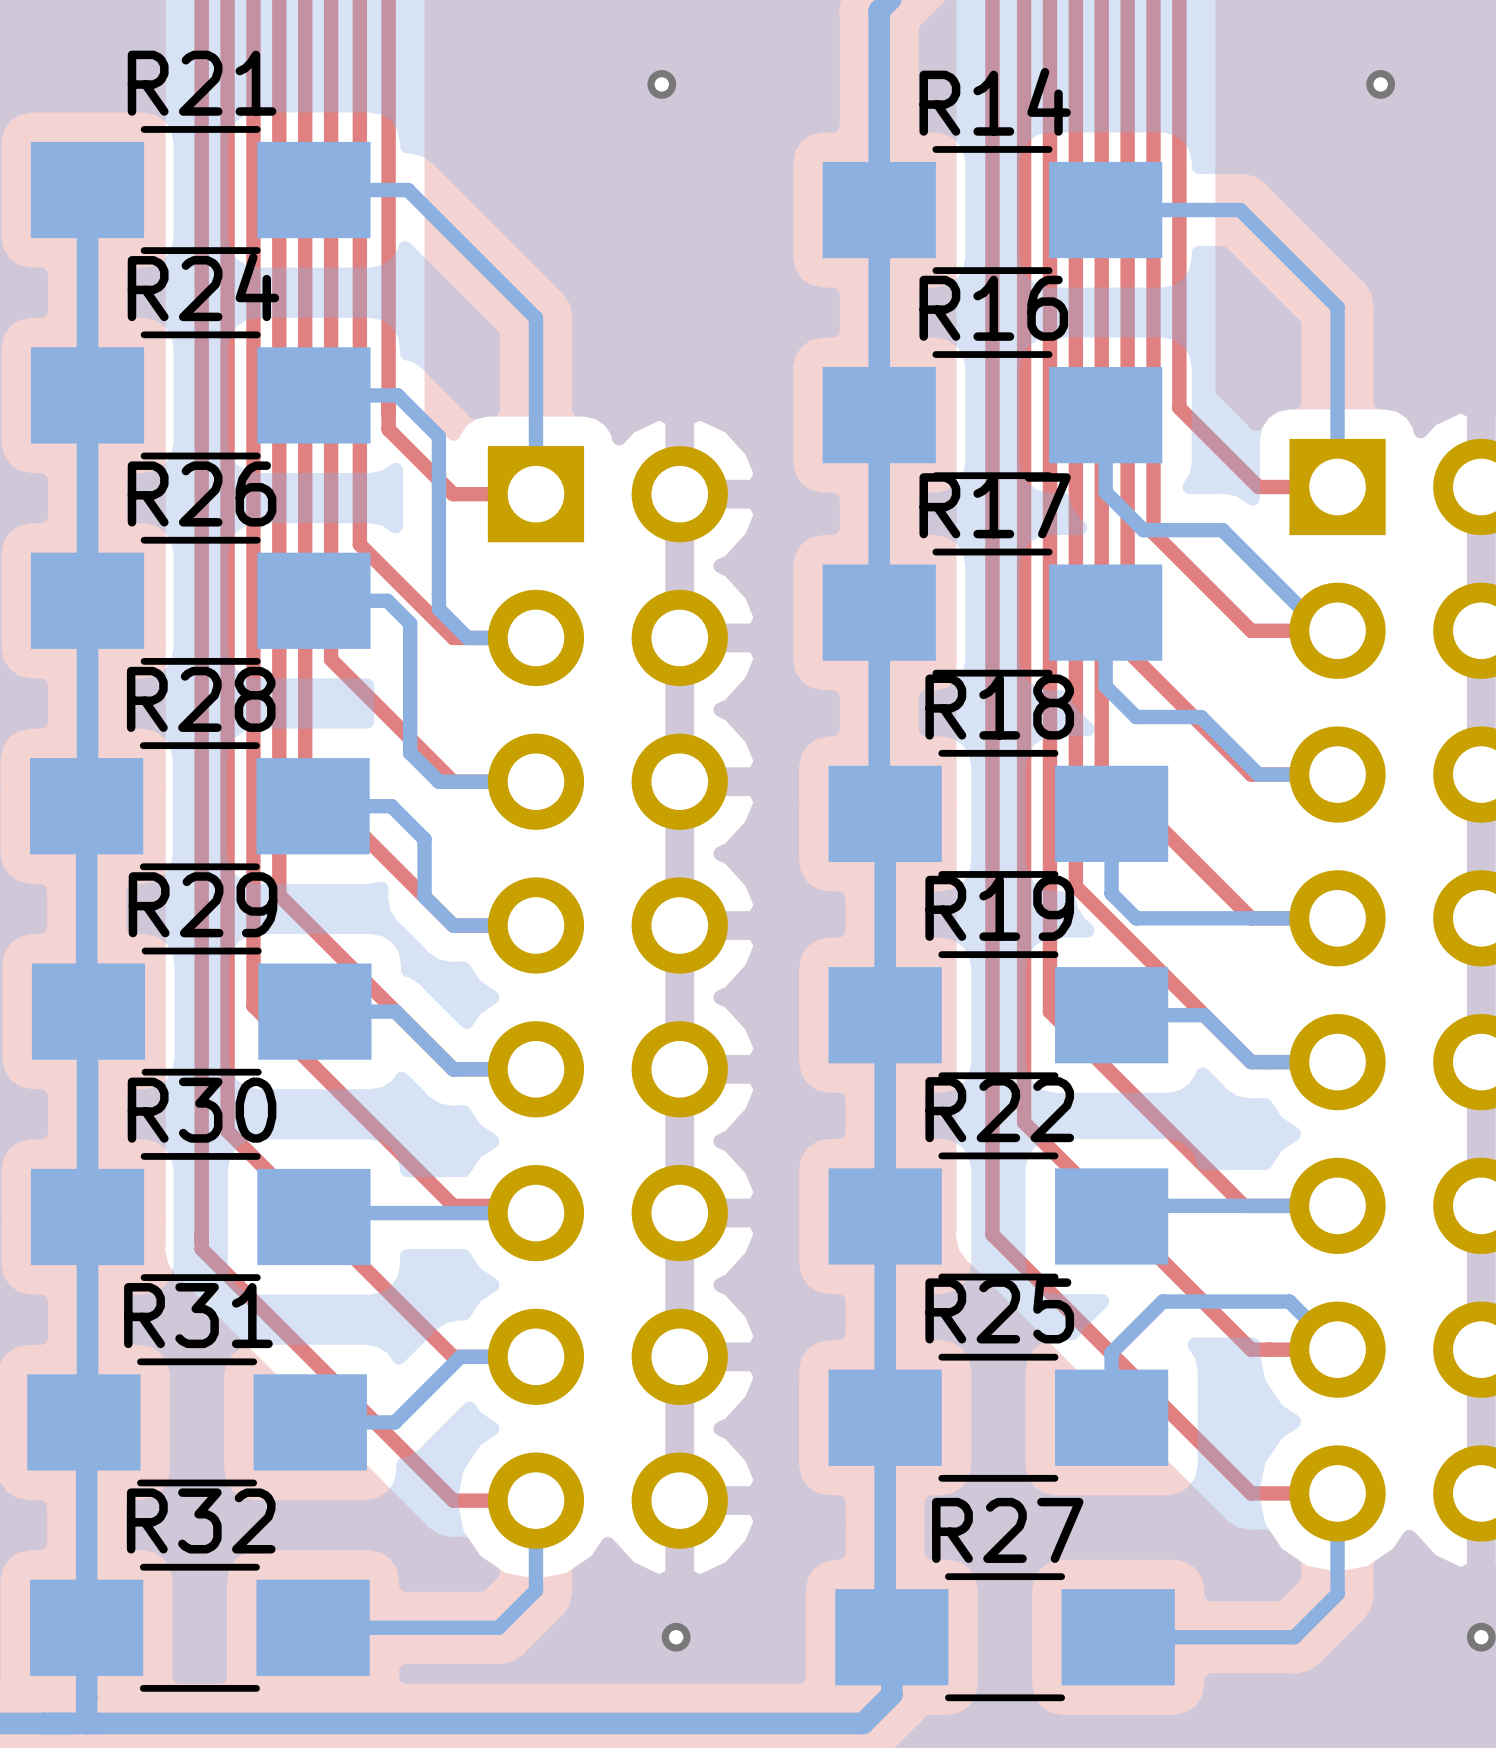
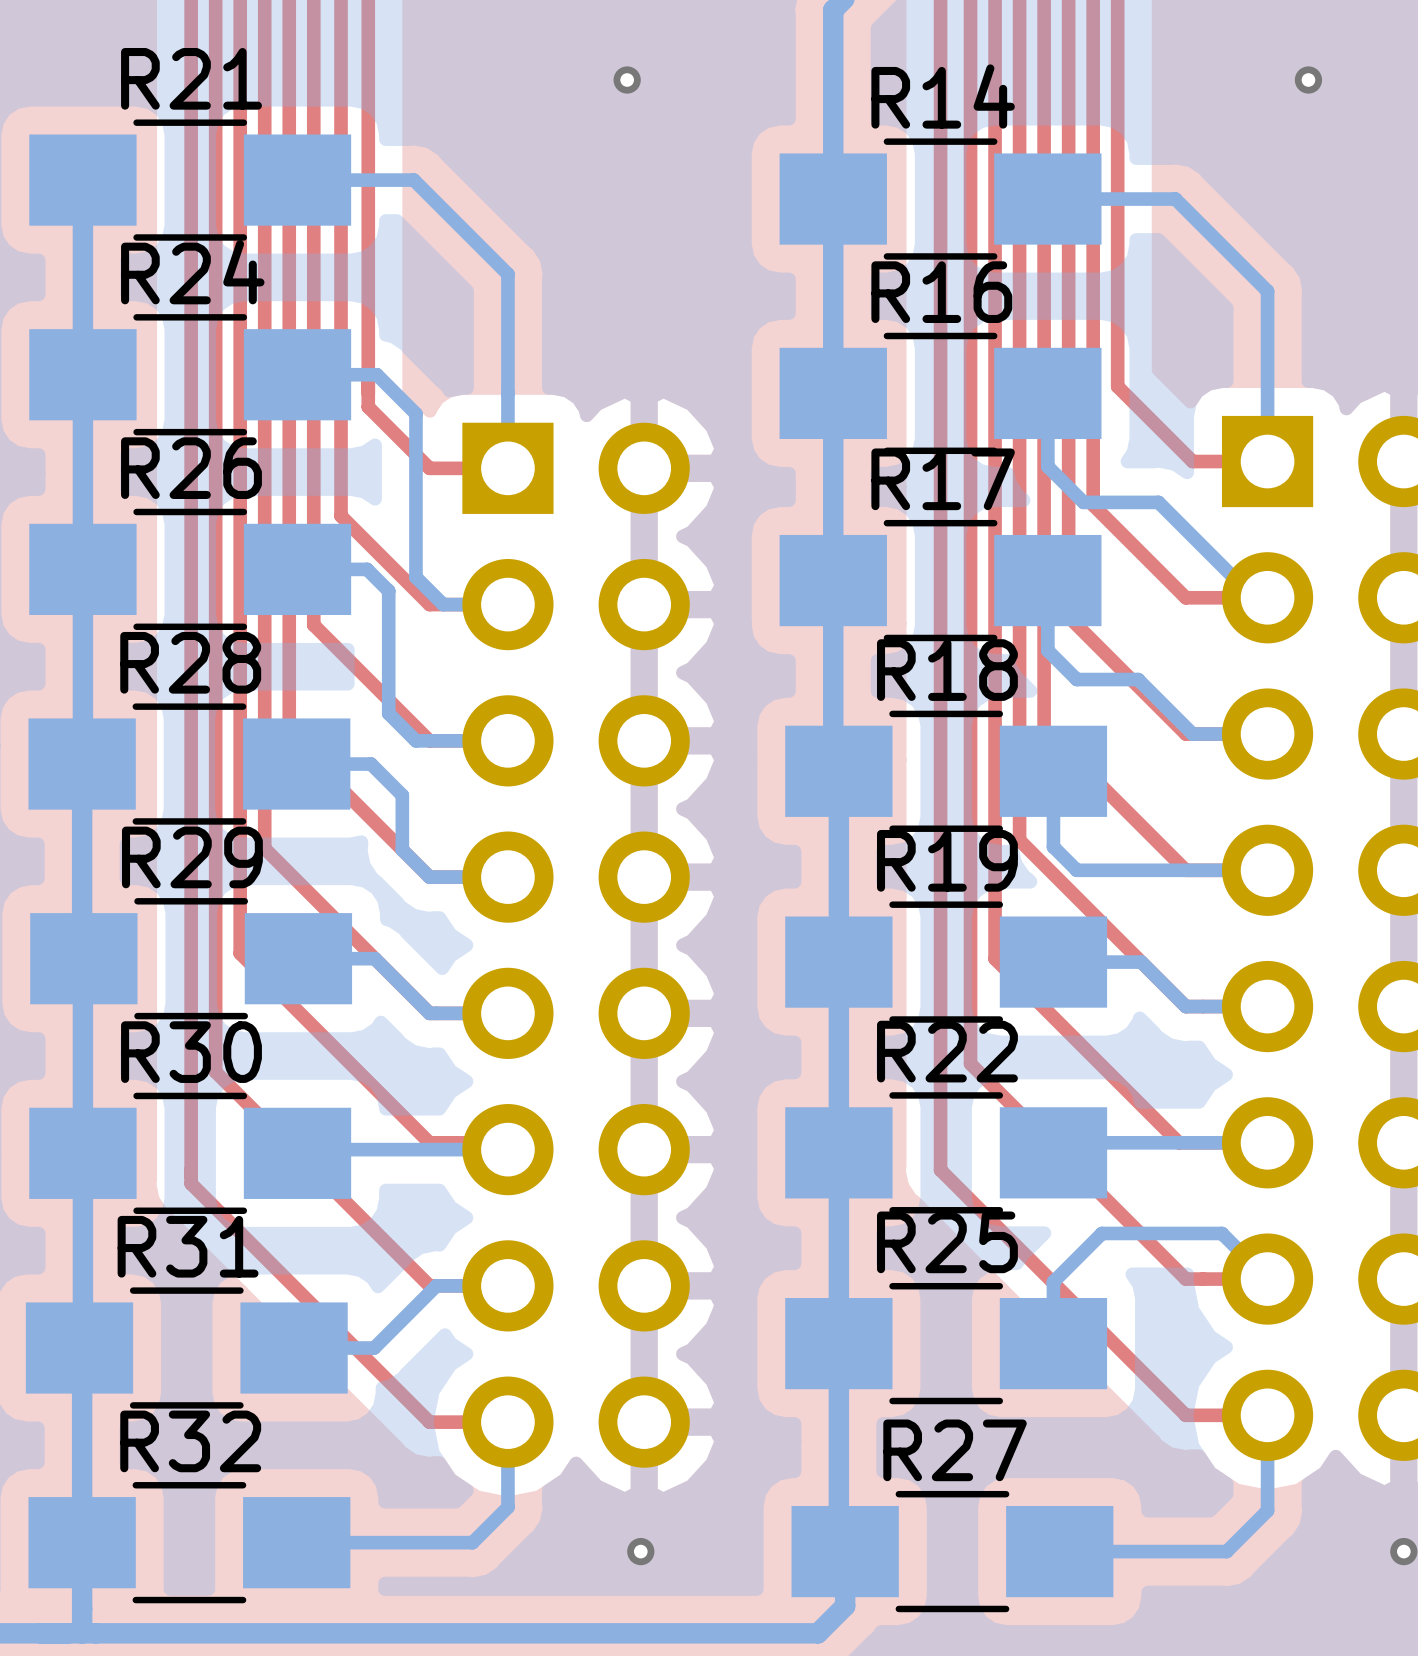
bottom track: (407, 190) (535, 318) -> (386, 180) (413, 180) (507, 274) (507, 301)

